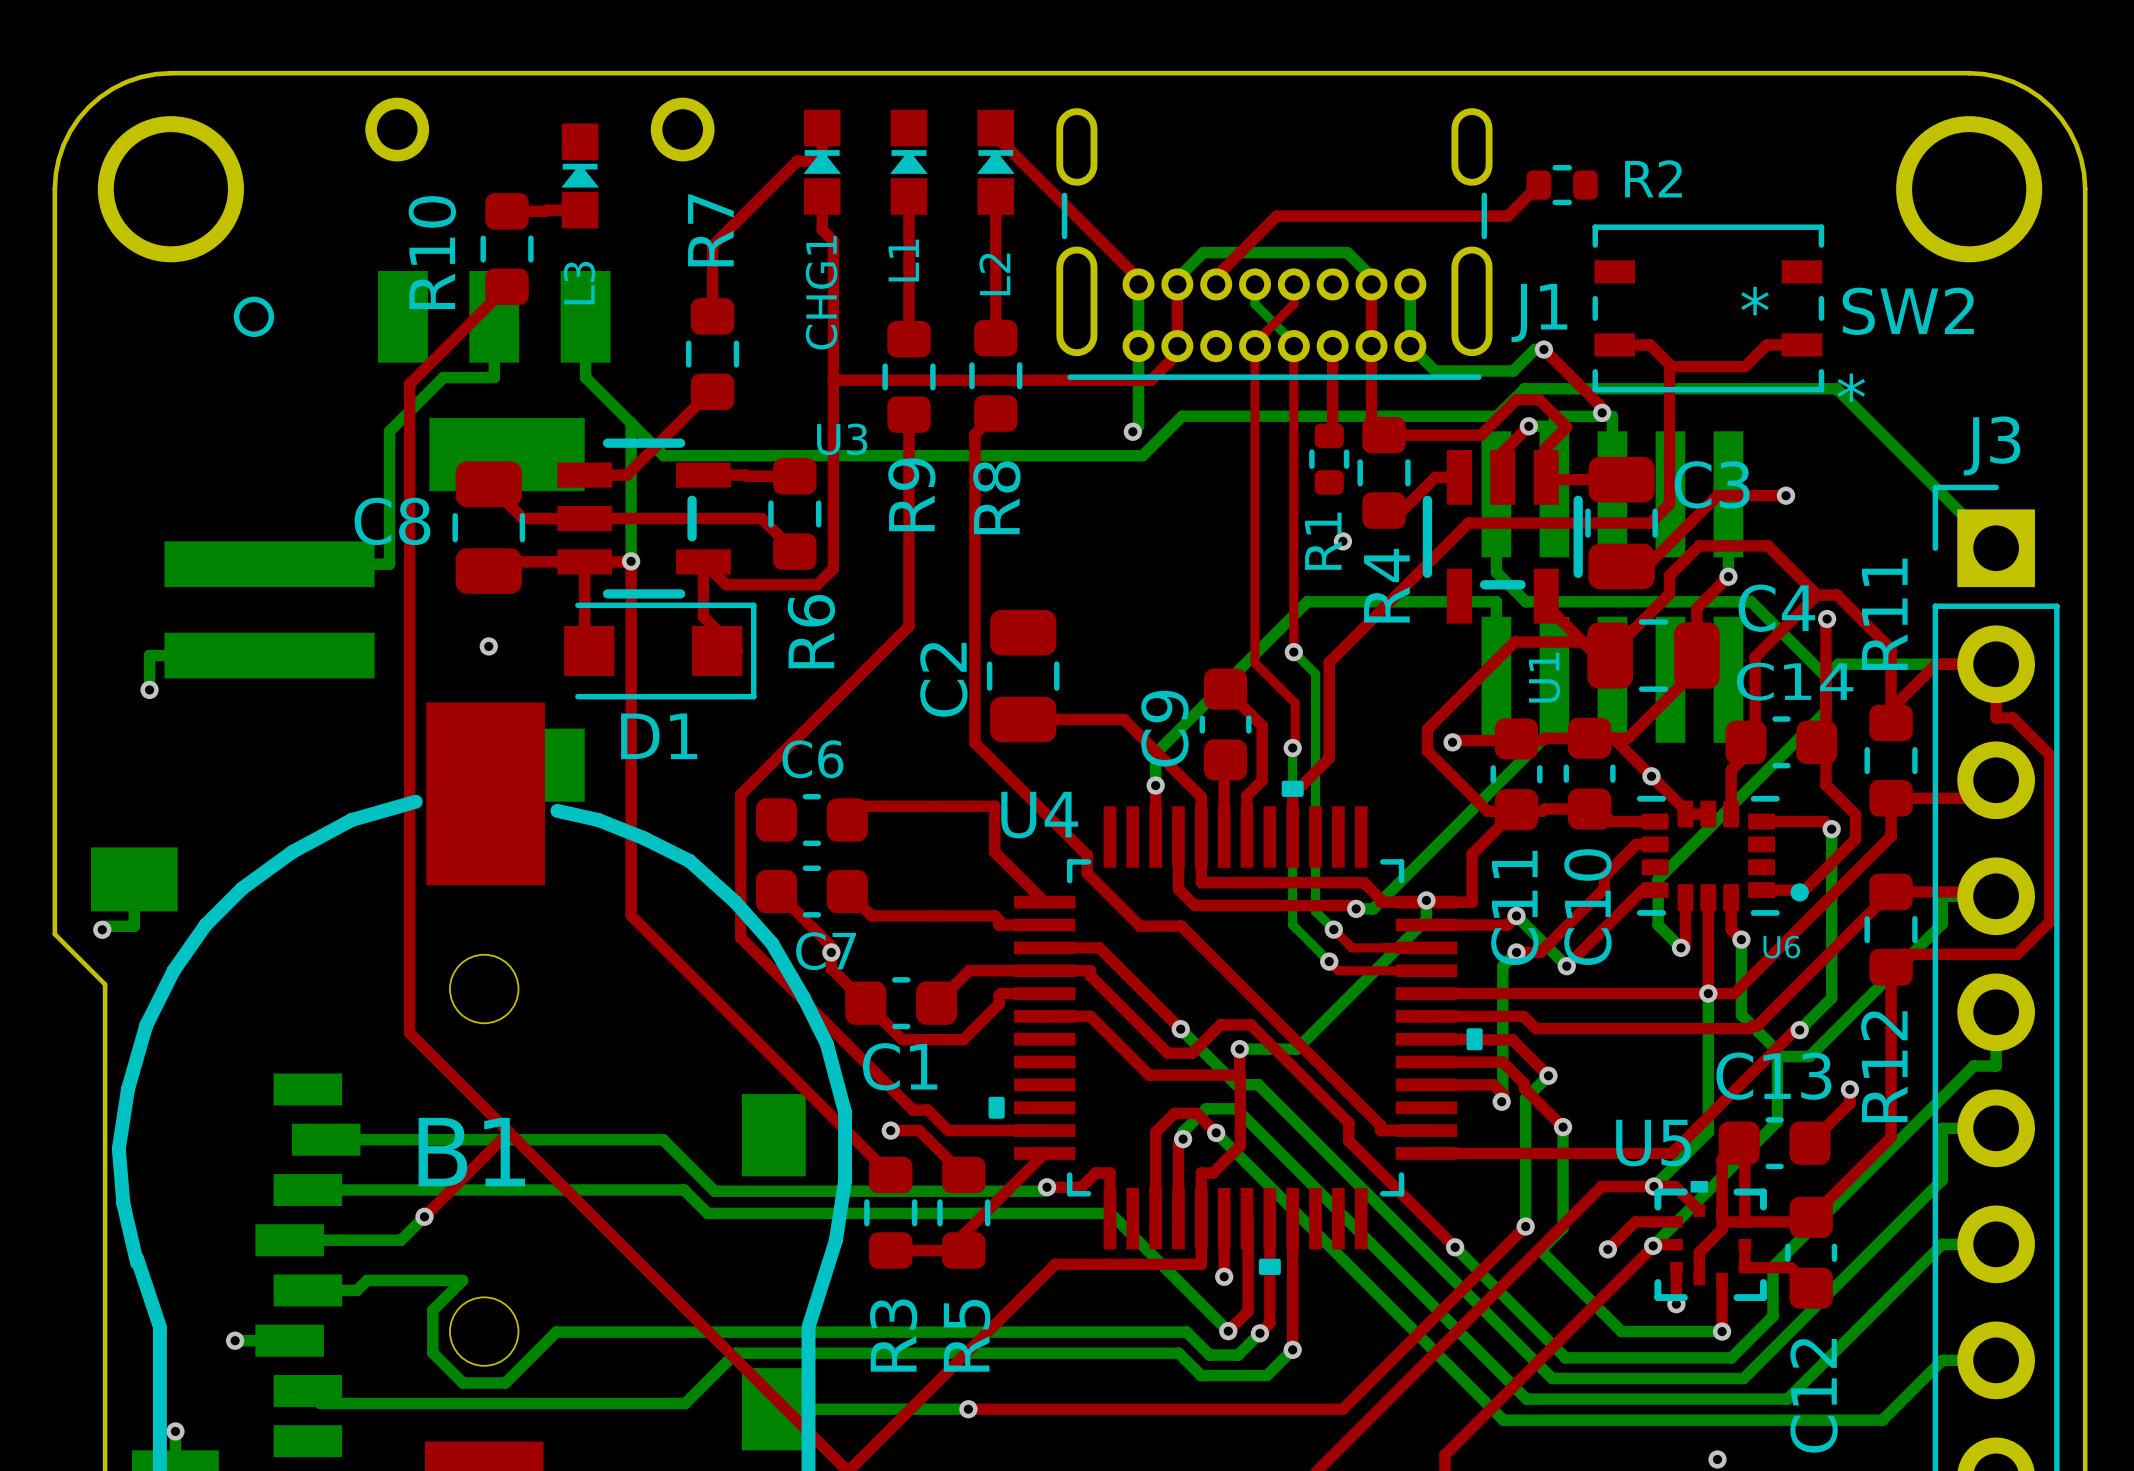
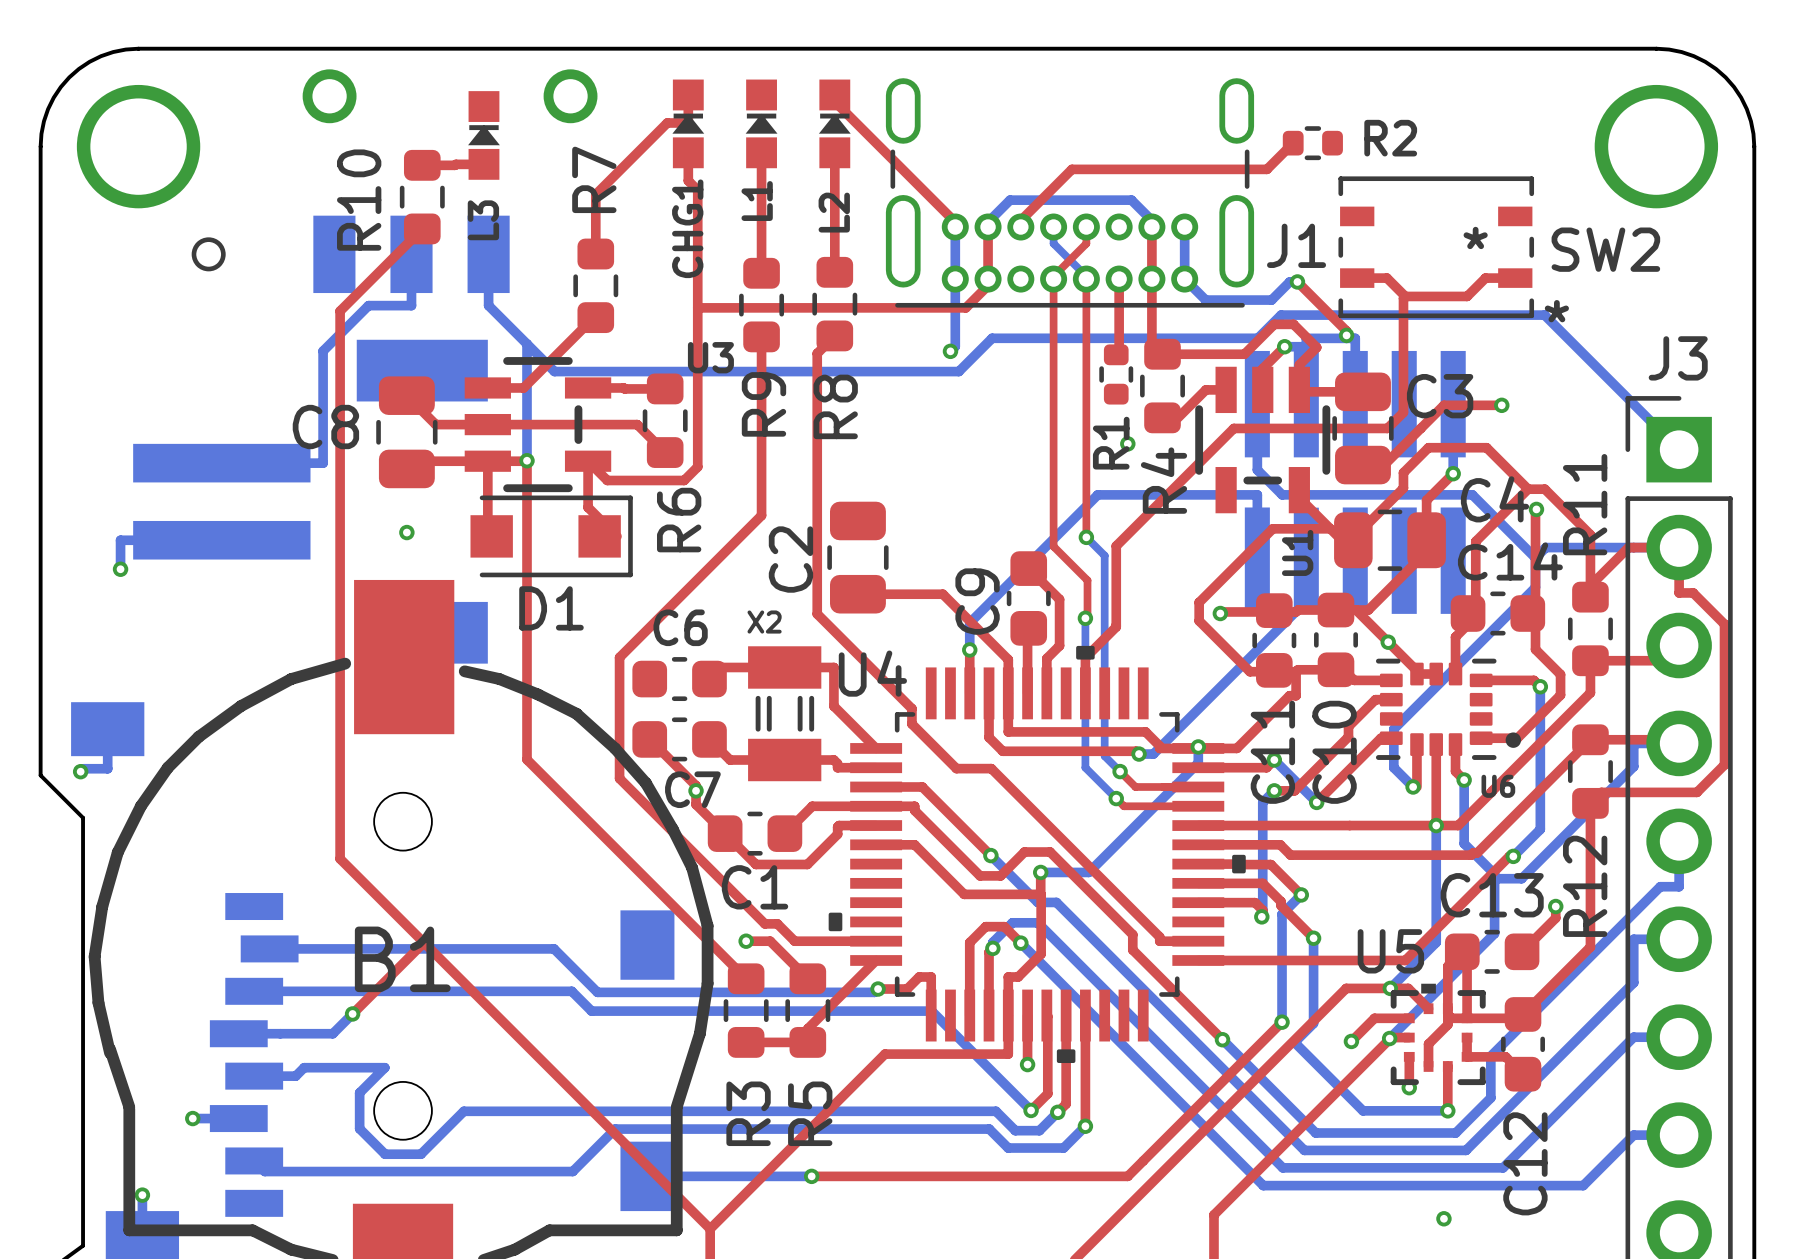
top track: (1516, 809) (1472, 854) (1472, 902) -> (1296, 671) (1296, 695) (1289, 695) (1236, 748)
X2: none -> (784, 713)

